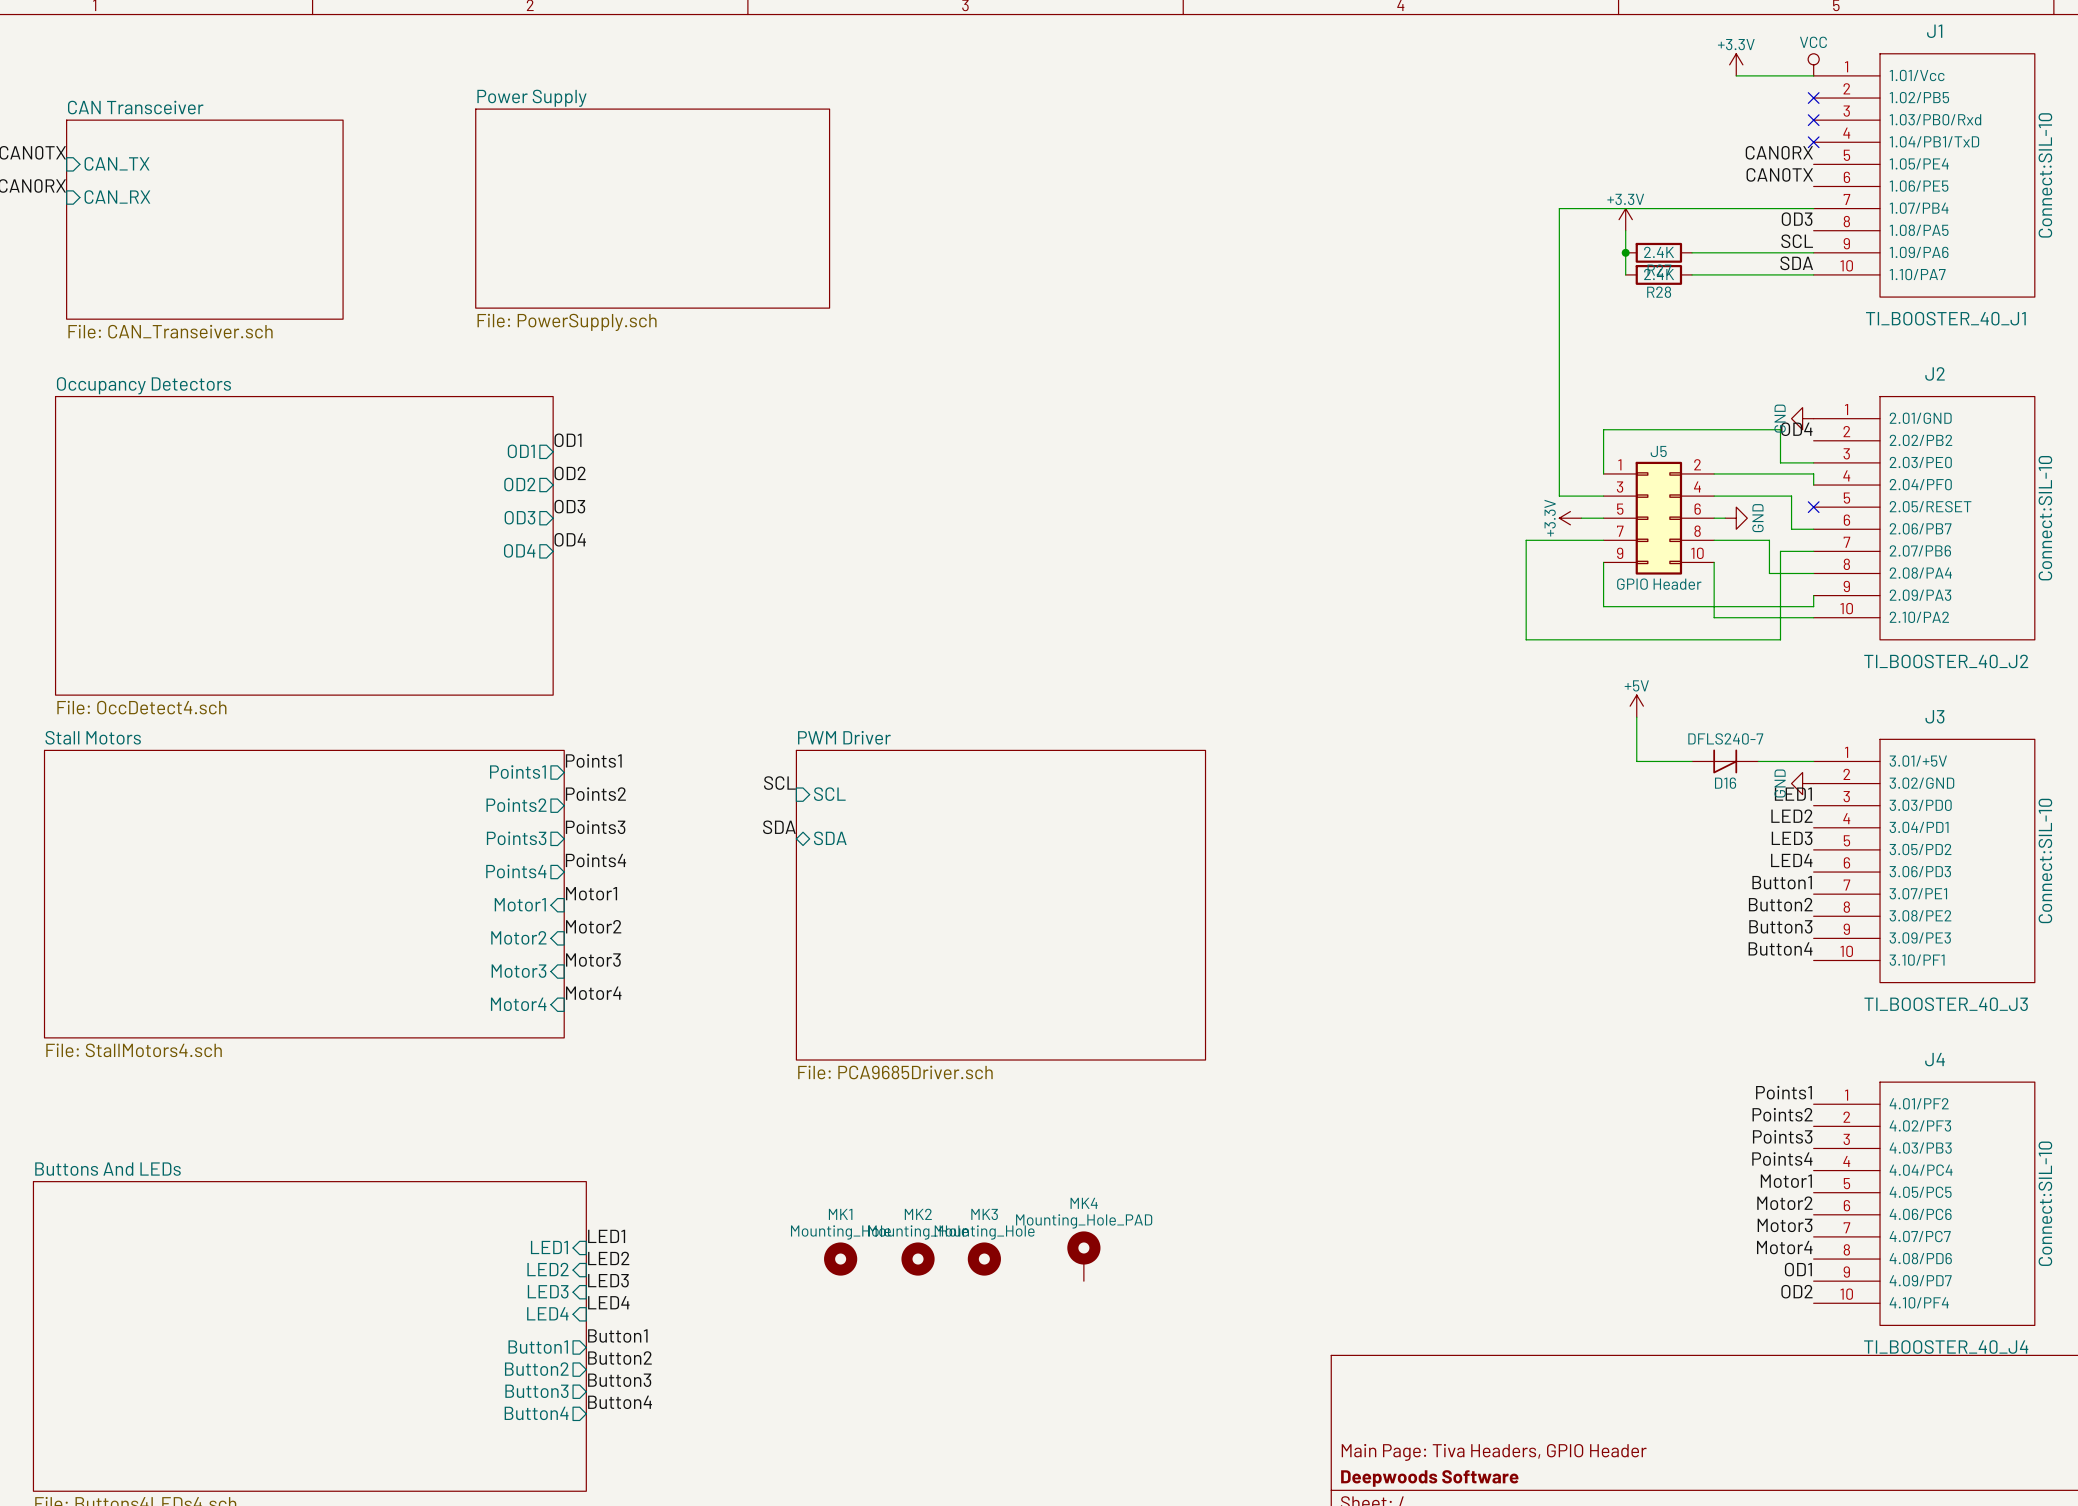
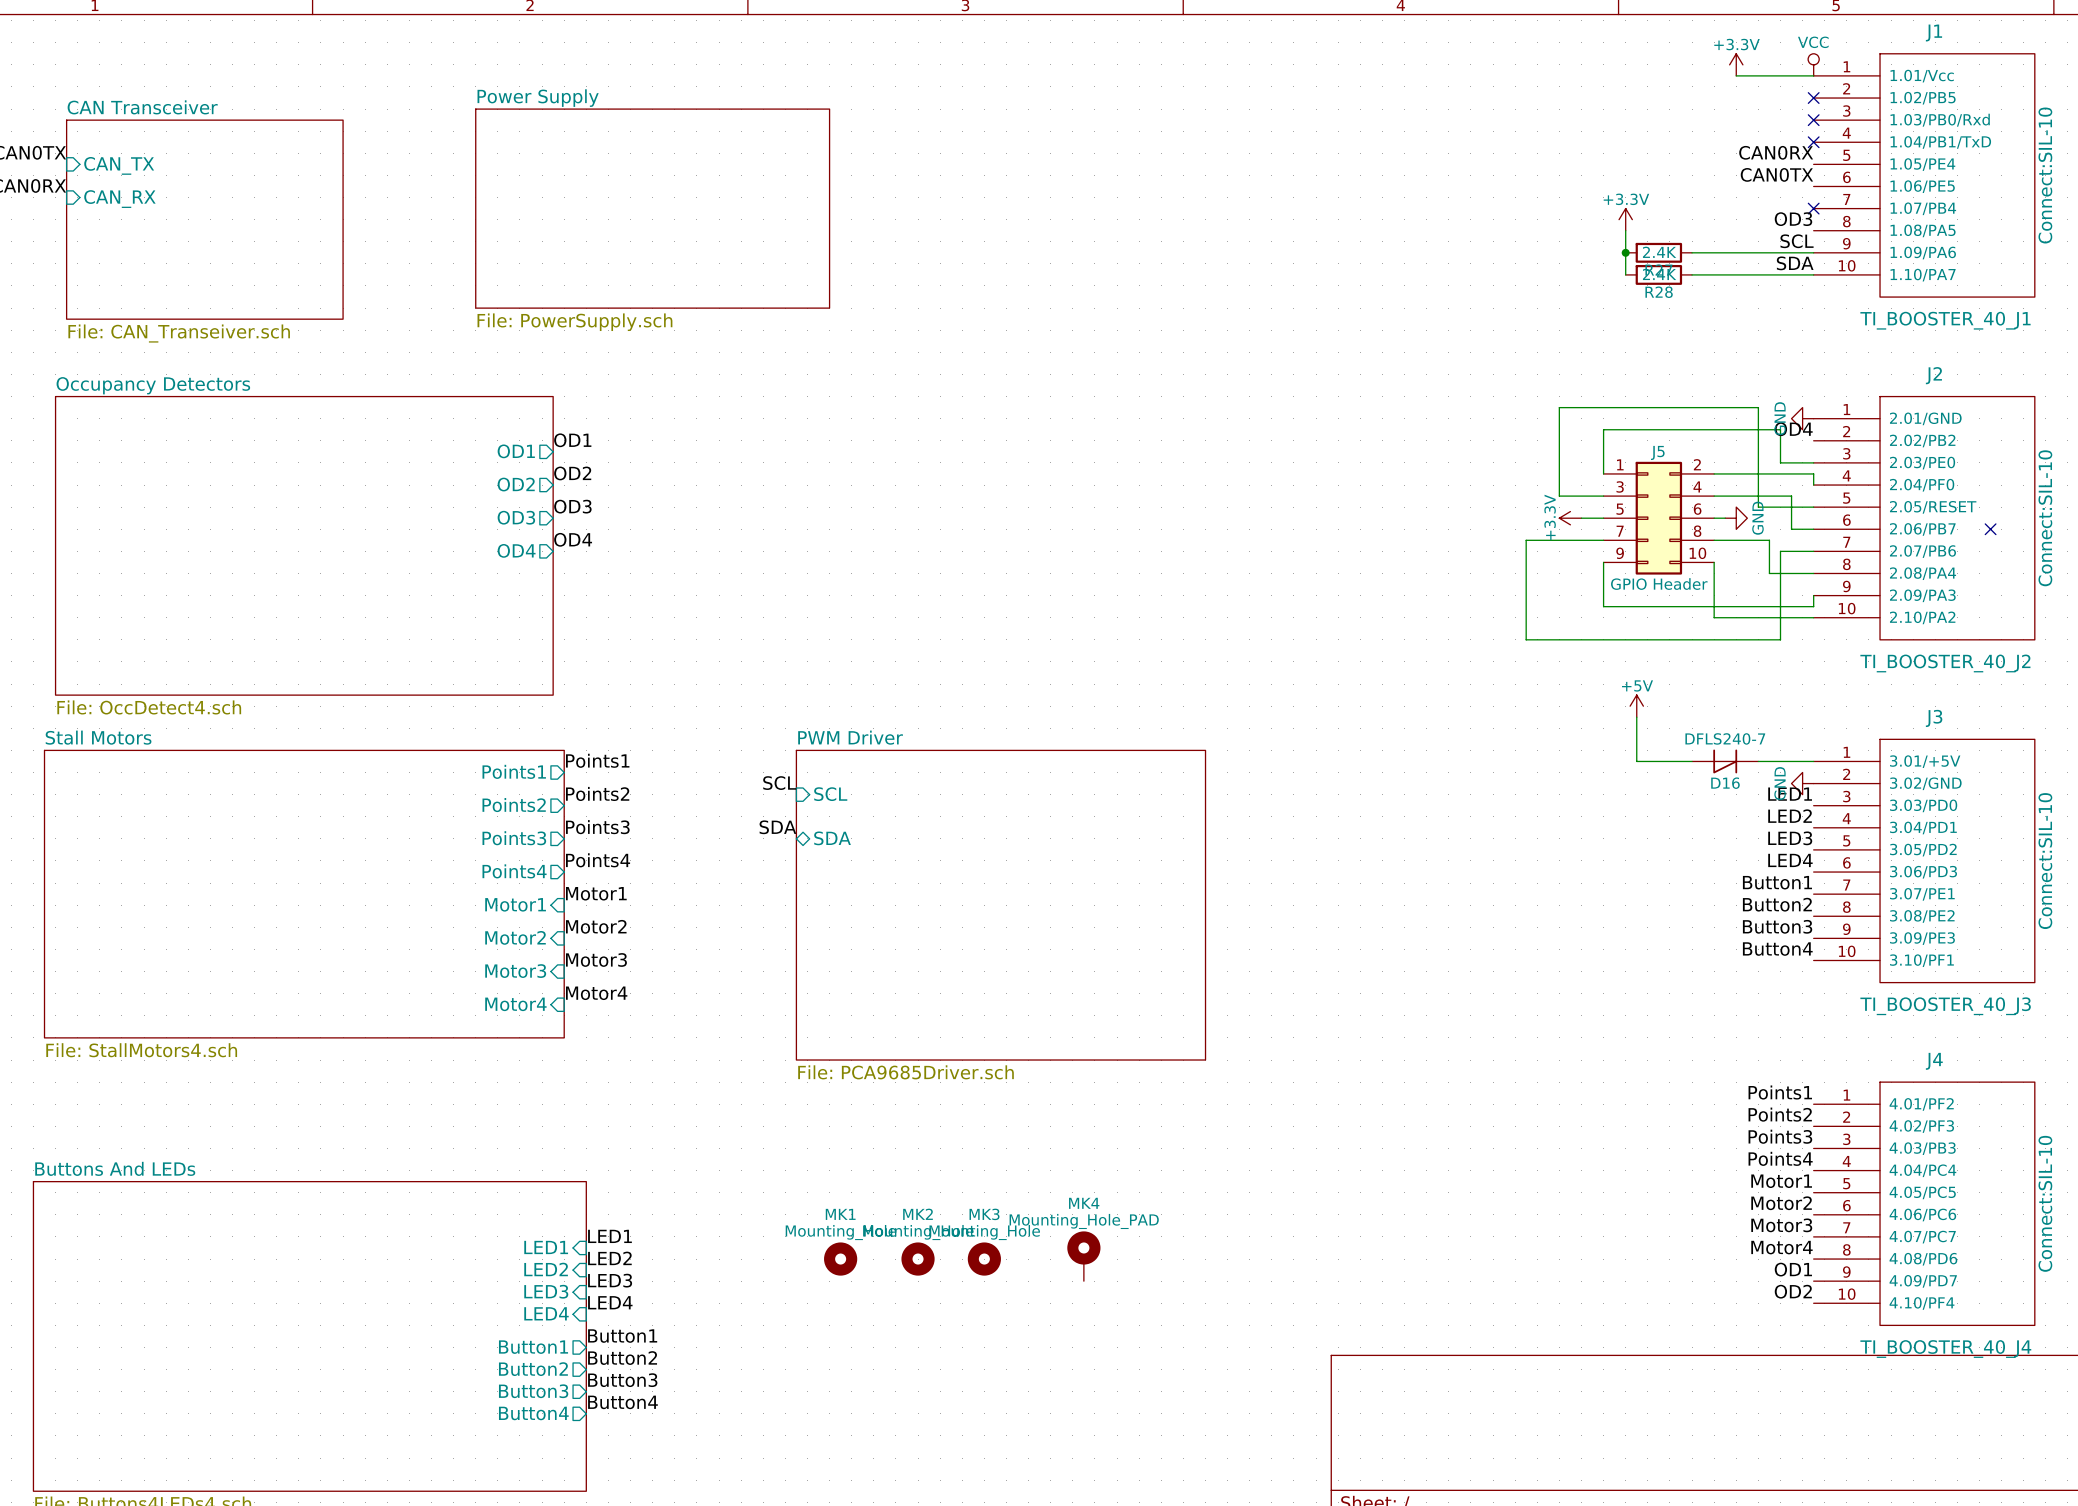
wire: (1813, 208) (1559, 208) (1559, 407) -> (1813, 507) (1758, 507) (1758, 407) (1559, 407)
no-connect mark: none -> (1813, 208)
no-connect mark: (1813, 507) -> none
no-connect mark: none -> (1990, 529)
title block: Main Page: Tiva Headers, GPIO Header (1494, 1452) -> none
title block: Deepwoods Software (1429, 1478) -> none

